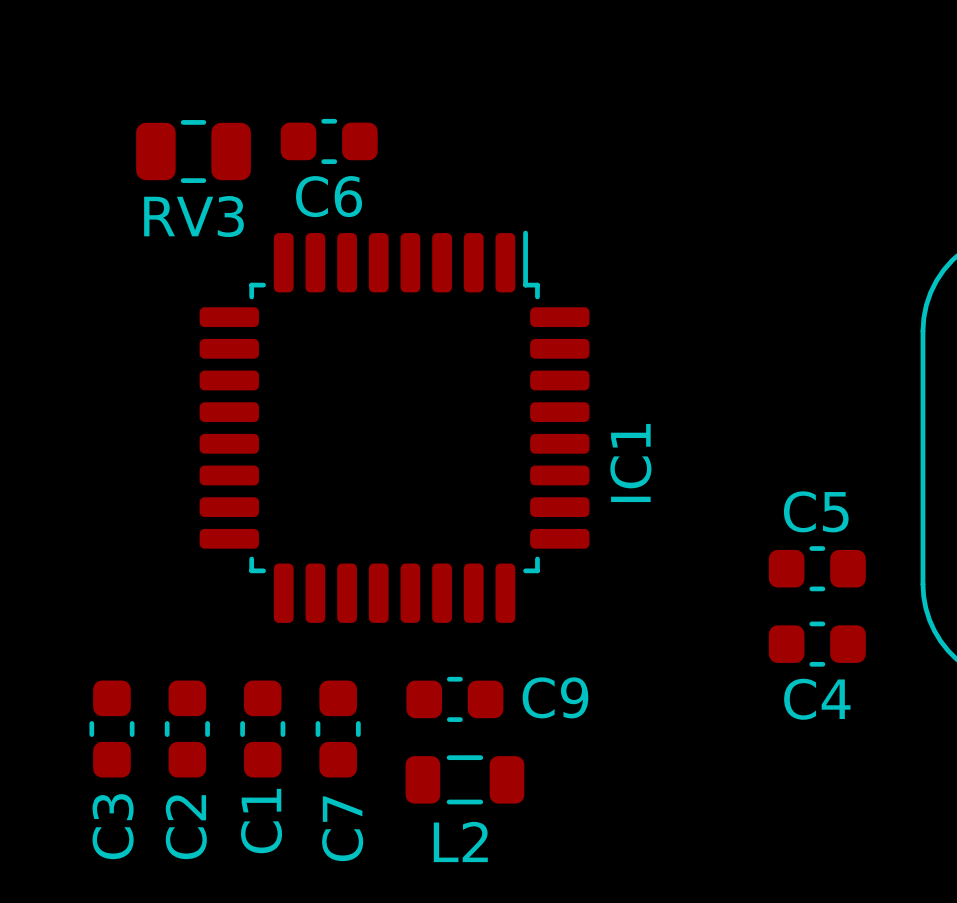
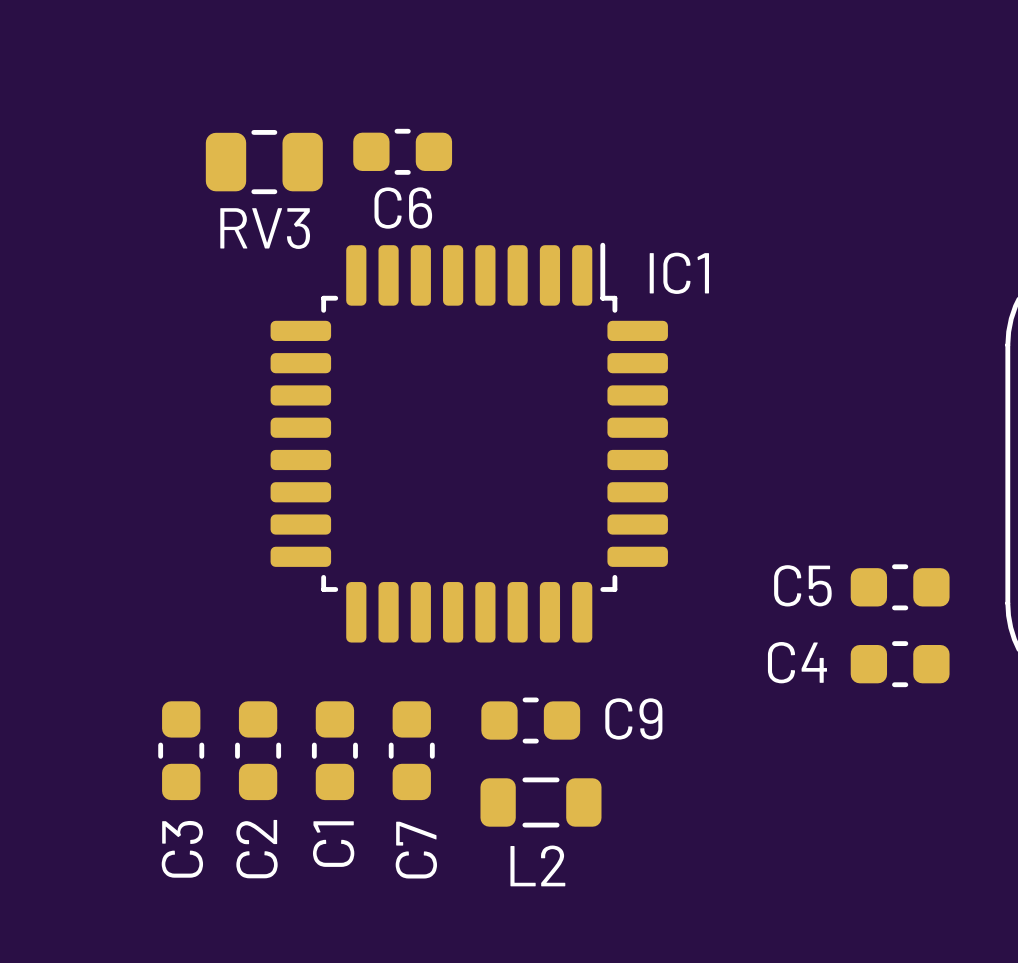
IC1 name rotation: 0° (630, 463) -> 90° clockwise (679, 273)
IC1 name position: IC1 (630, 463) -> IC1 (679, 273)
C5 name position: C5 (816, 511) -> C5 (802, 585)
C4 name position: C4 (817, 699) -> C4 (797, 662)

